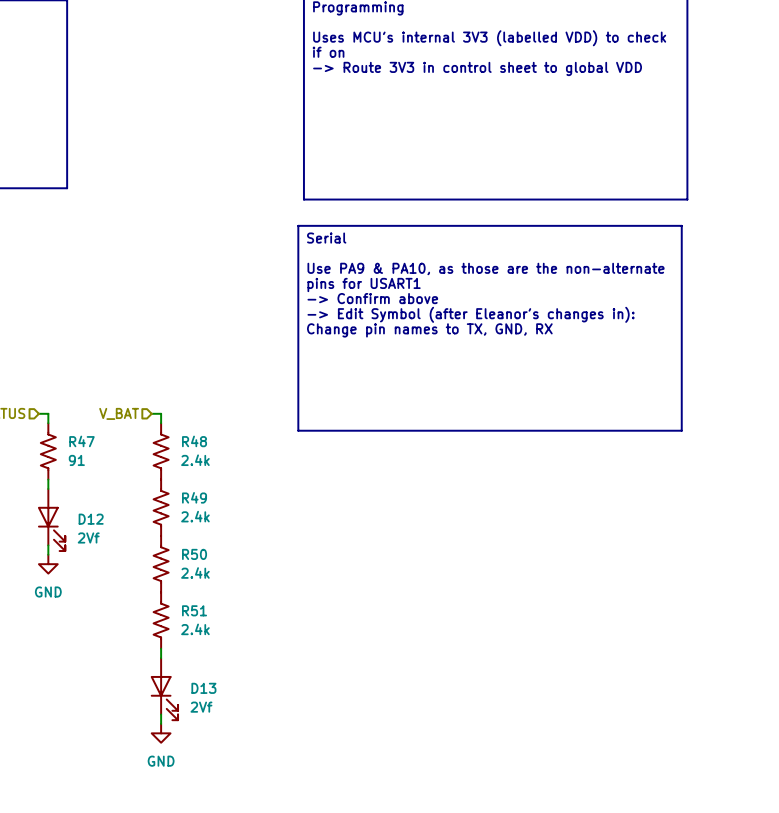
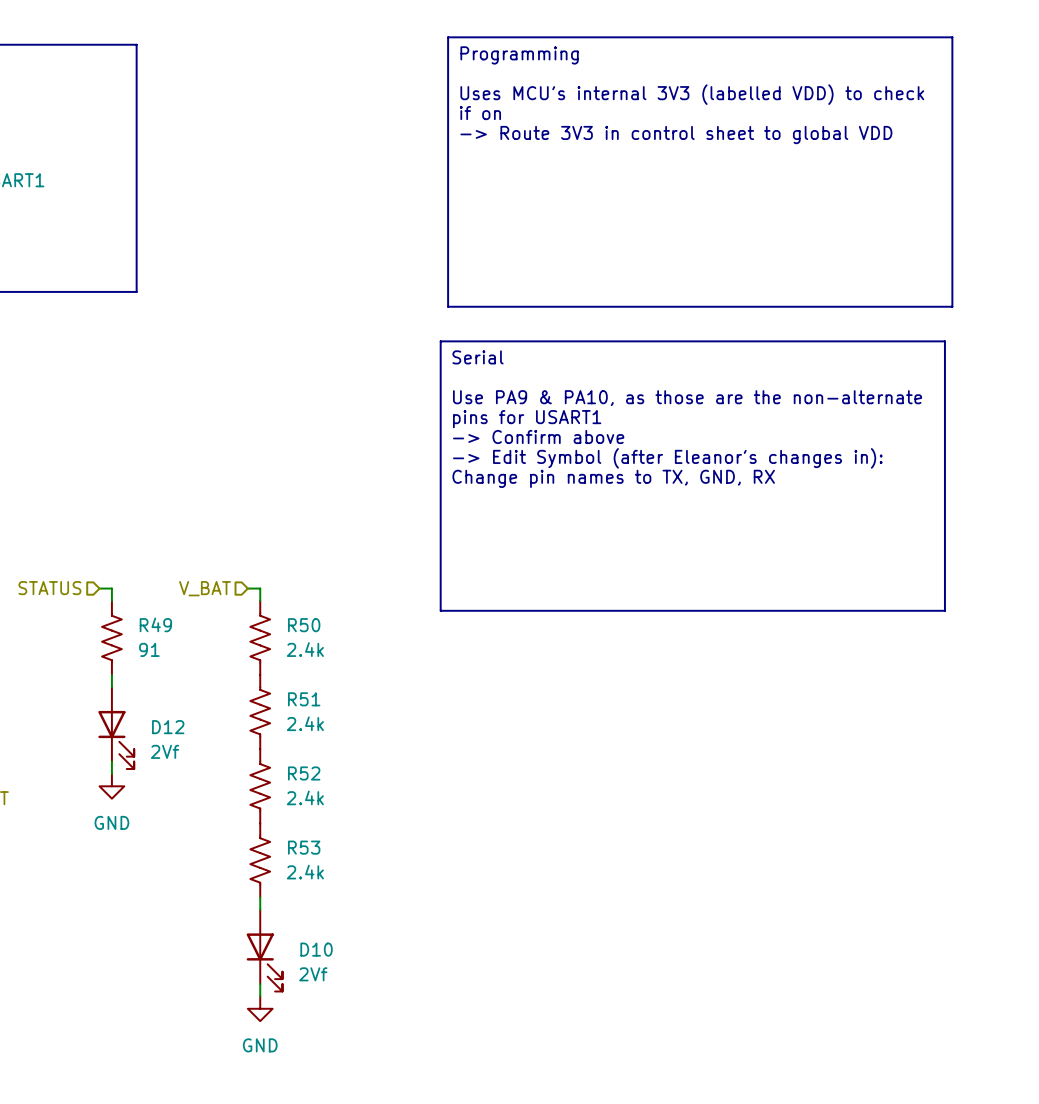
R47 name: R47 (81, 441) -> R49 (155, 624)
R48 name: R48 (194, 441) -> R50 (304, 625)
R49 name: R49 (194, 497) -> R51 (304, 699)
R50 name: R50 (194, 554) -> R52 (304, 773)
R51 name: R51 (194, 610) -> R53 (304, 847)
D13 name: D13 (203, 688) -> D10 (316, 949)

